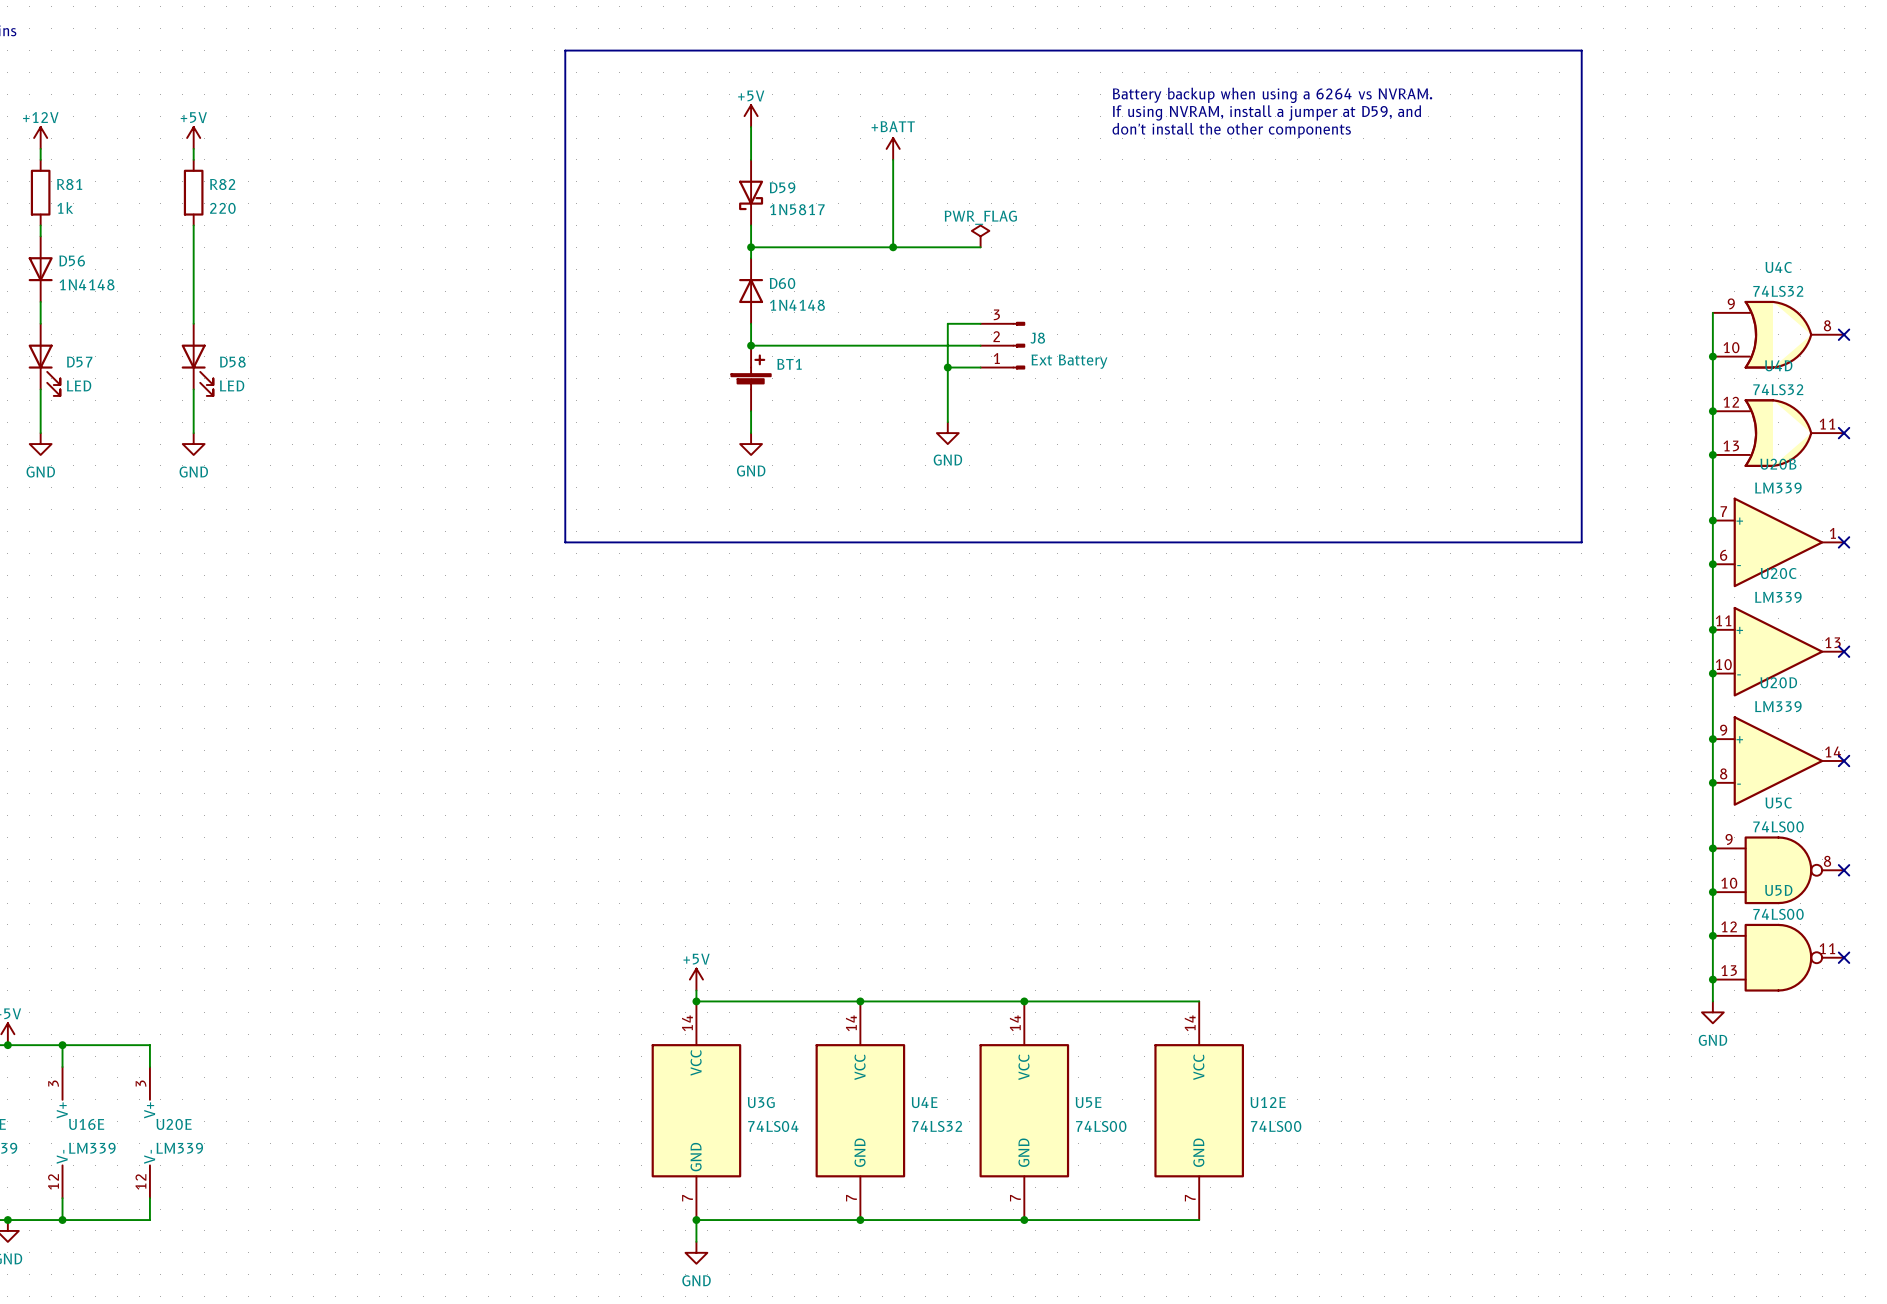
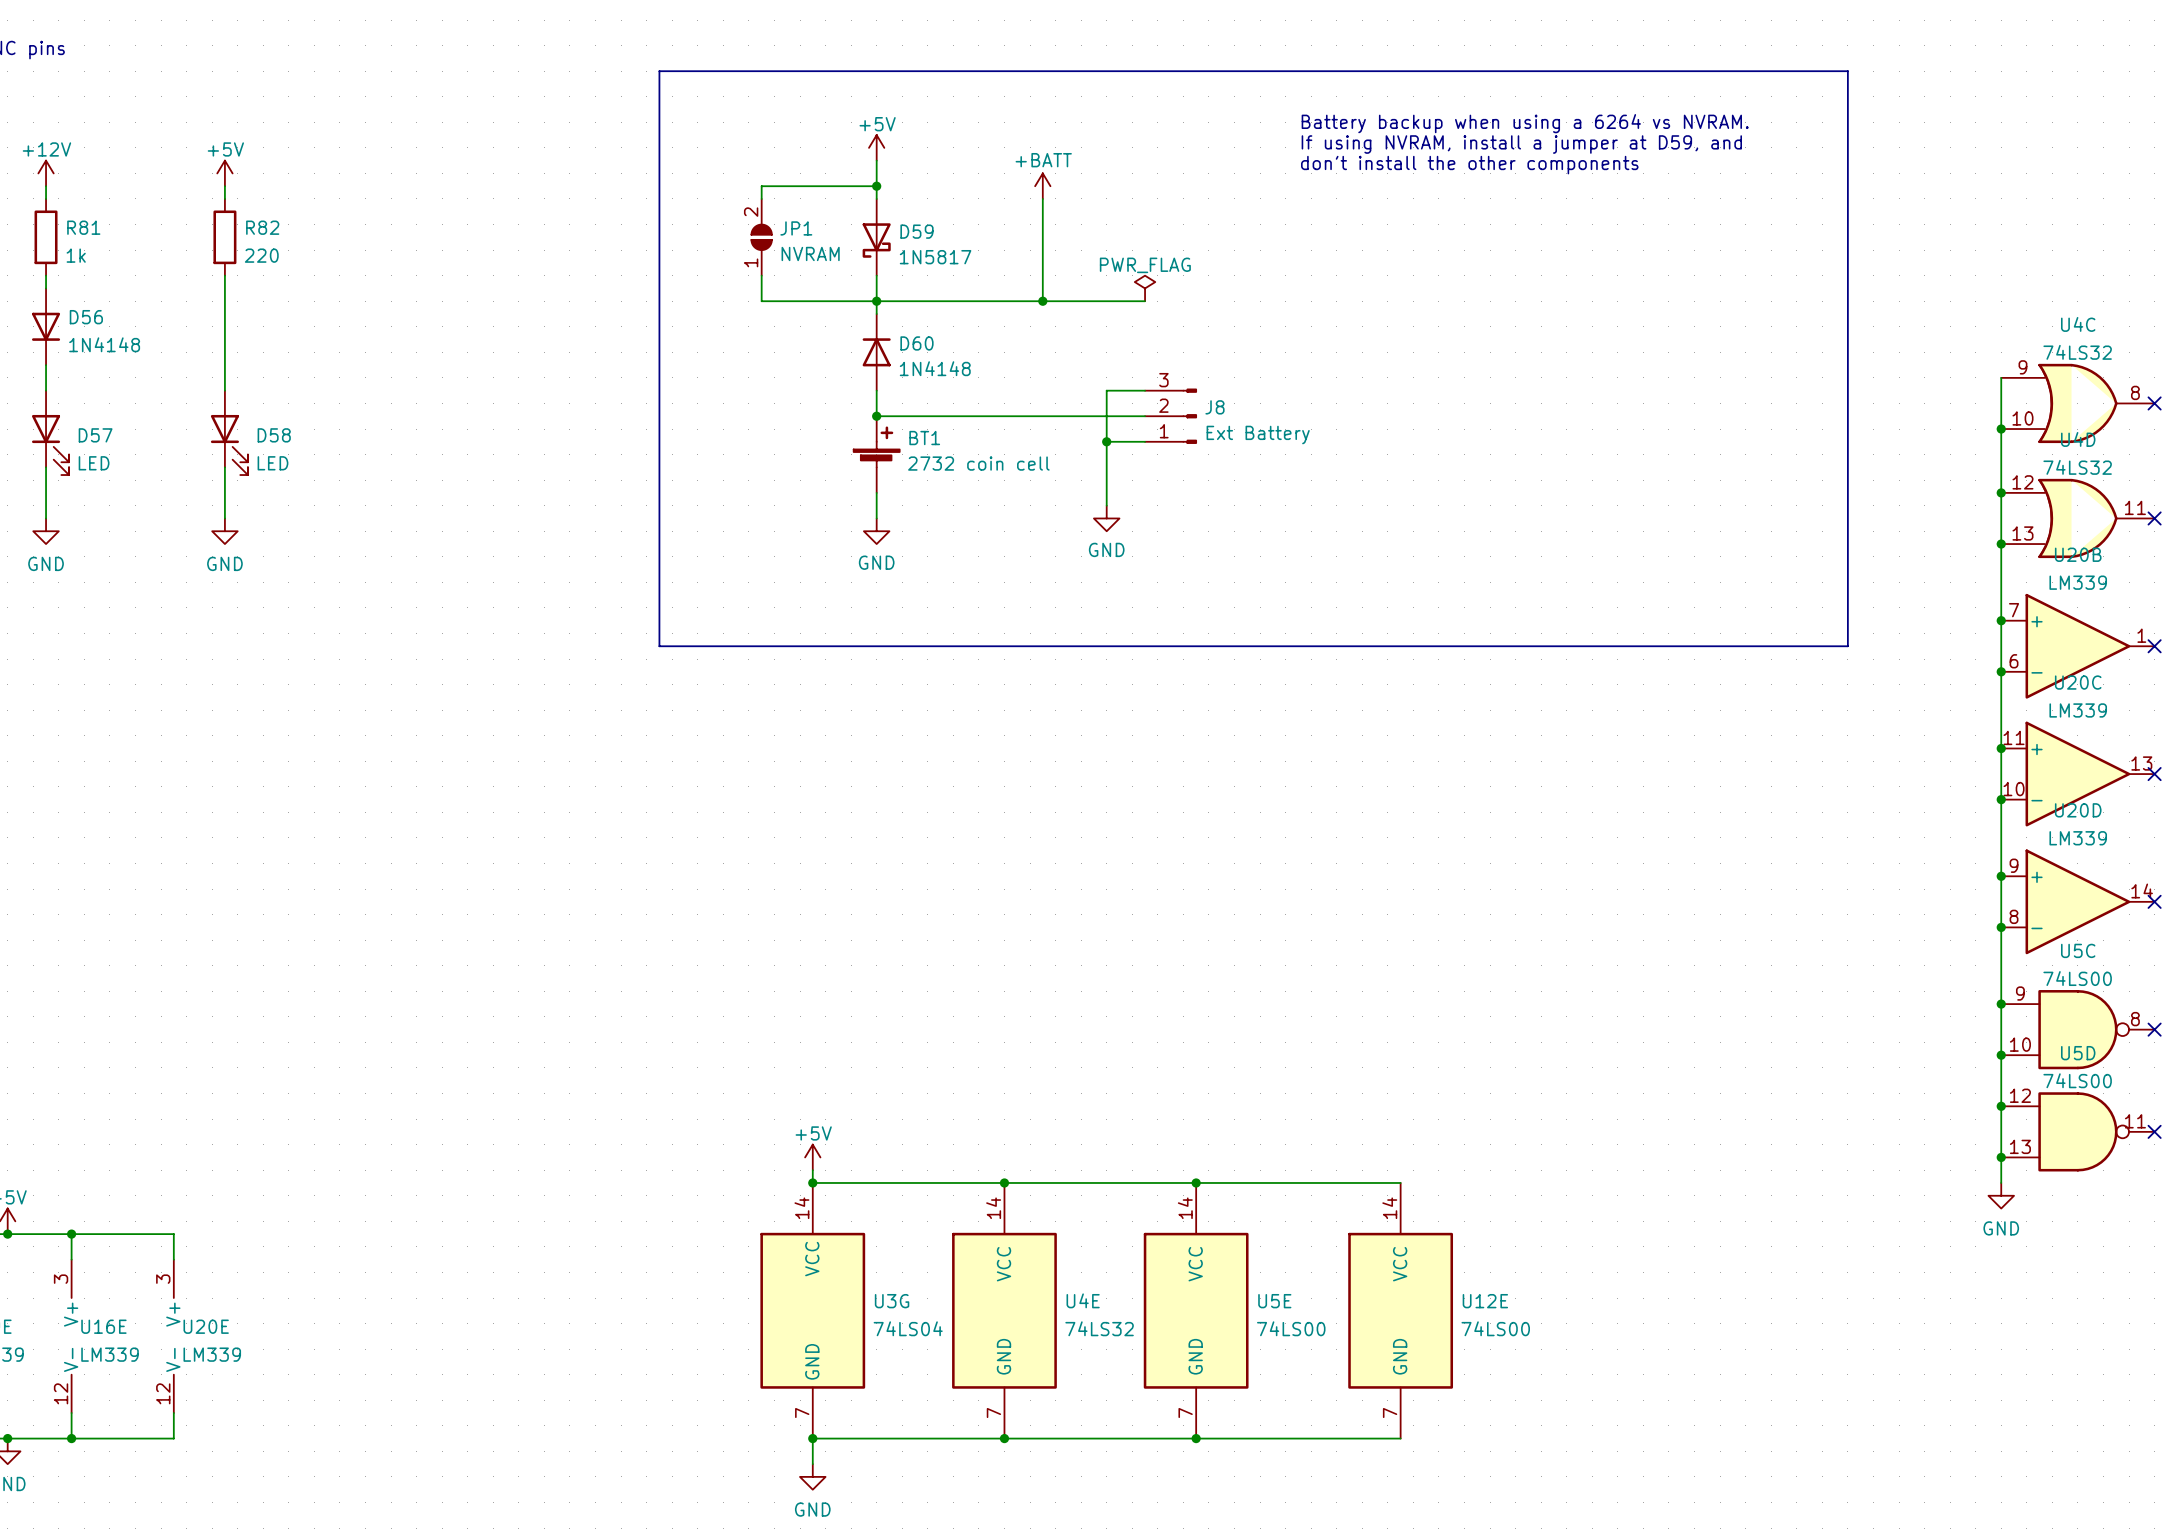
wire: none -> (876, 186) (761, 186) (761, 198)
junction: none -> (876, 186)
JP1: none -> NVRAM (761, 237)
wire: none -> (761, 275) (761, 301) (876, 301)
BT1 value: none -> 2732 coin cell (978, 463)

